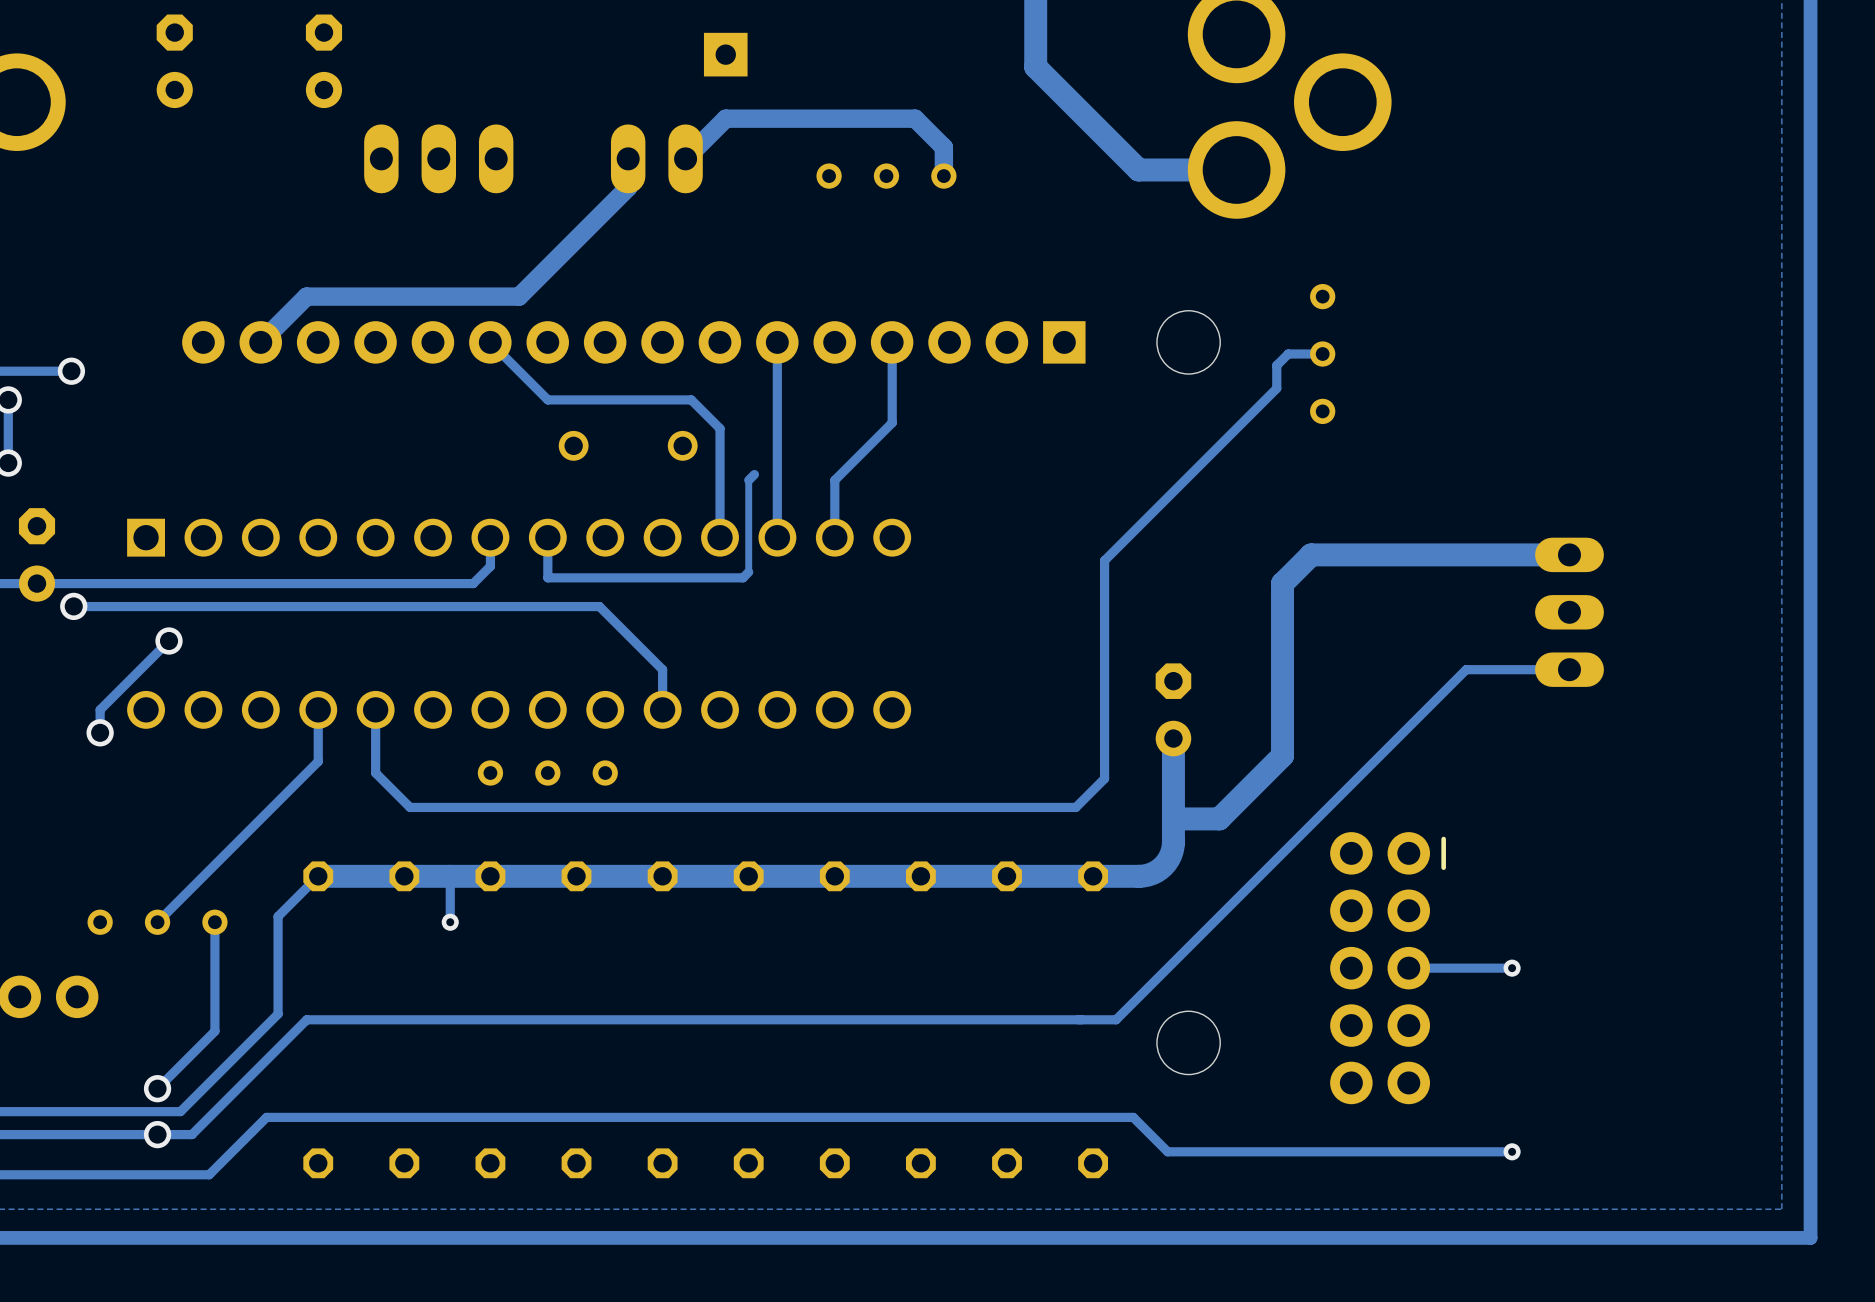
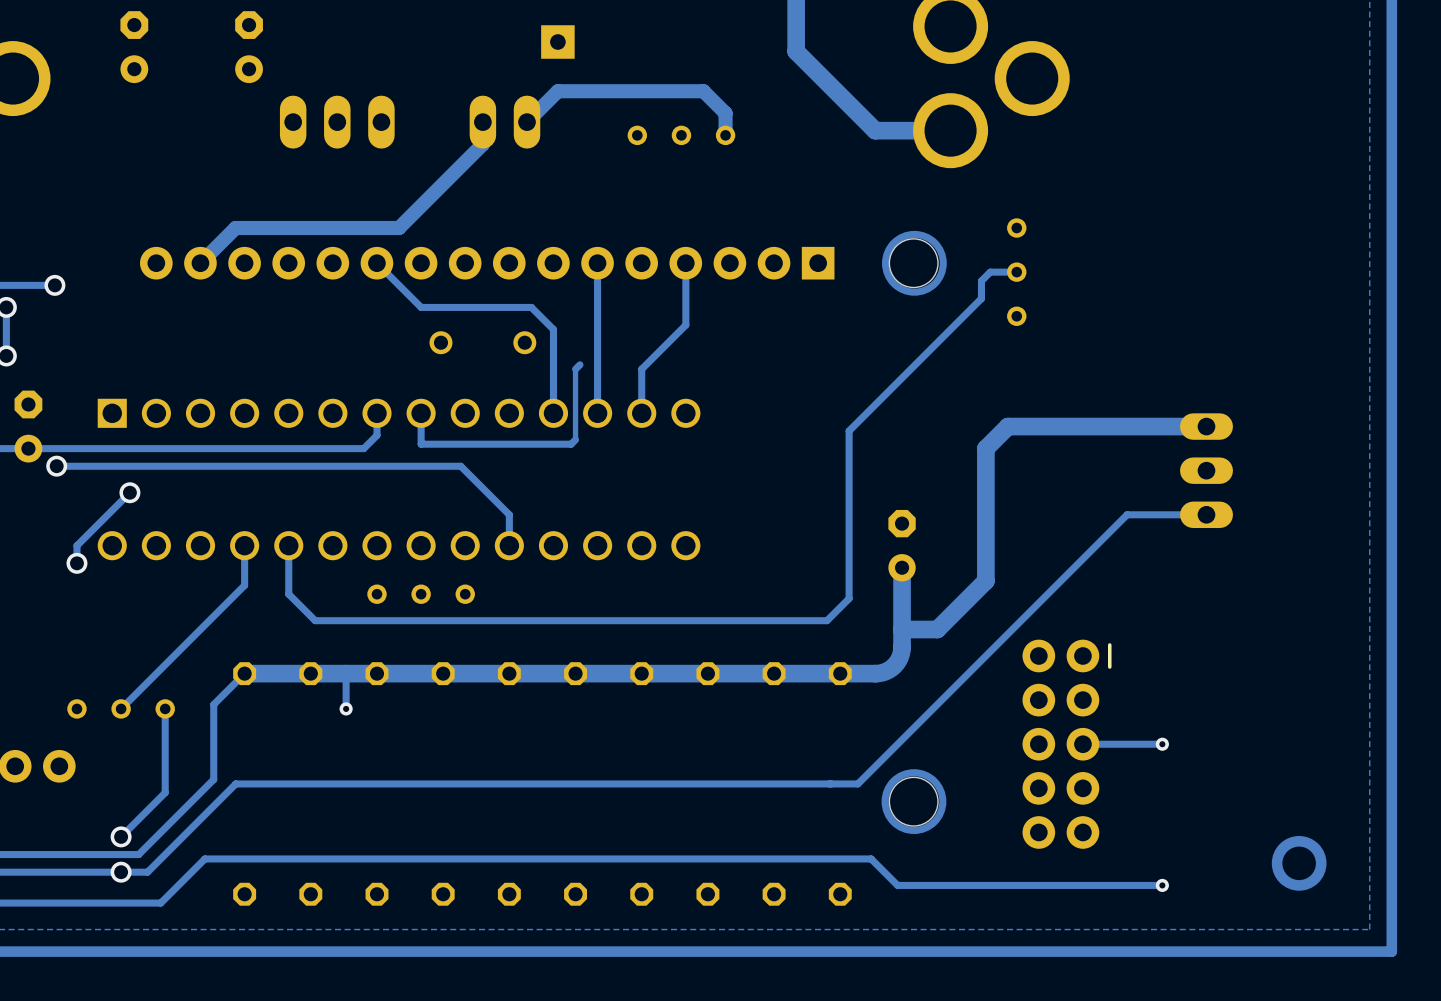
drawing: none -> [882, 230, 947, 296]
drawing: none -> [881, 769, 947, 834]
drawing: none -> [1271, 836, 1327, 891]

